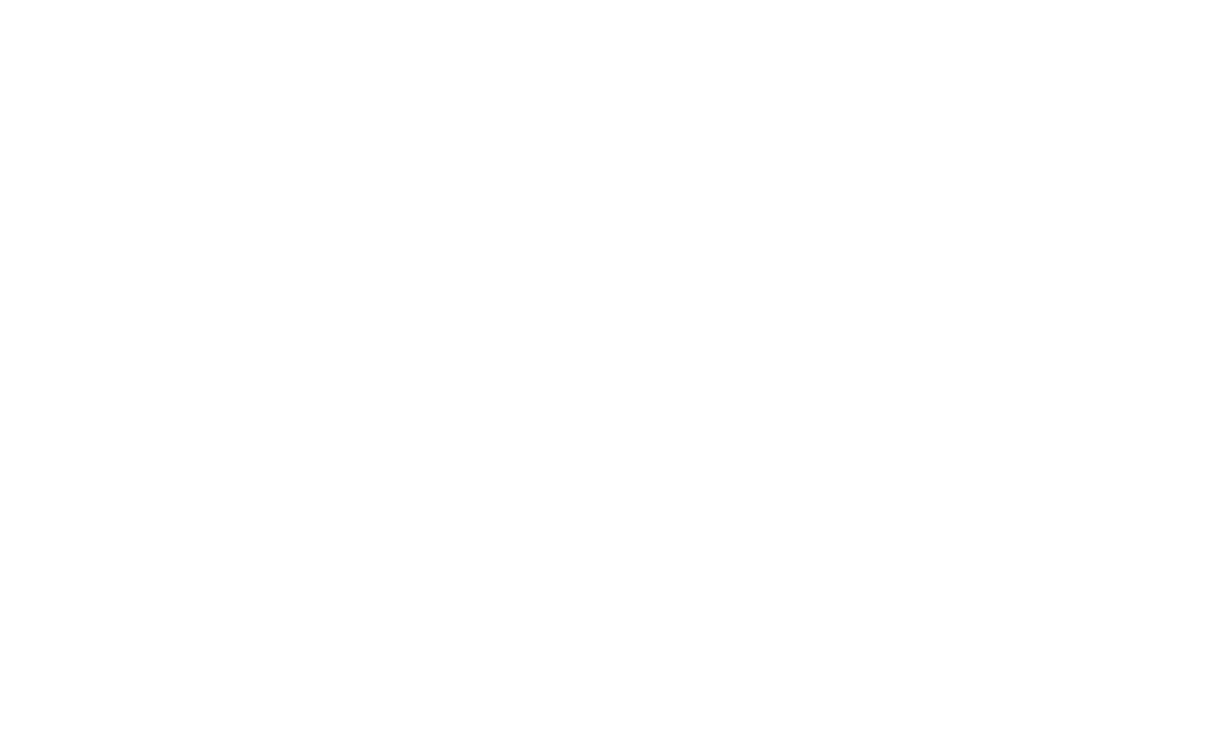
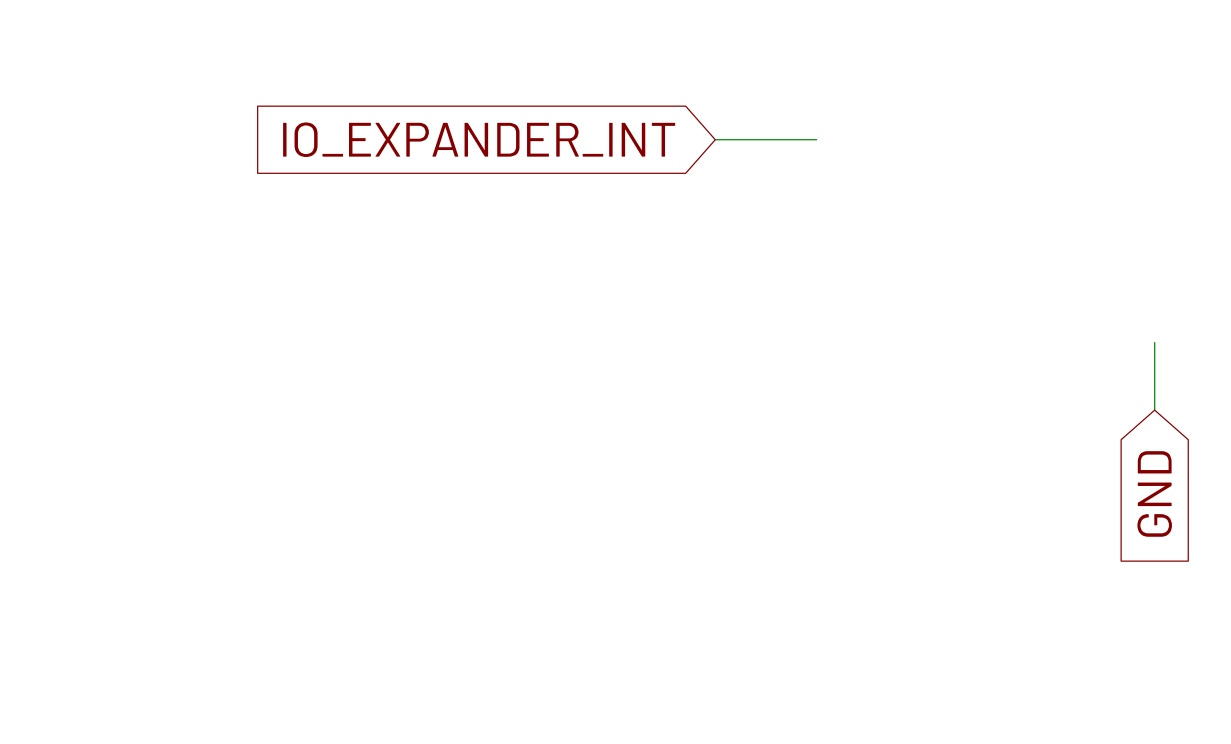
wire: none -> (715, 139) (816, 139)
global label: none -> IO_EXPANDER_INT (479, 139)
wire: none -> (1154, 342) (1154, 410)
global label: none -> GND (1154, 493)

